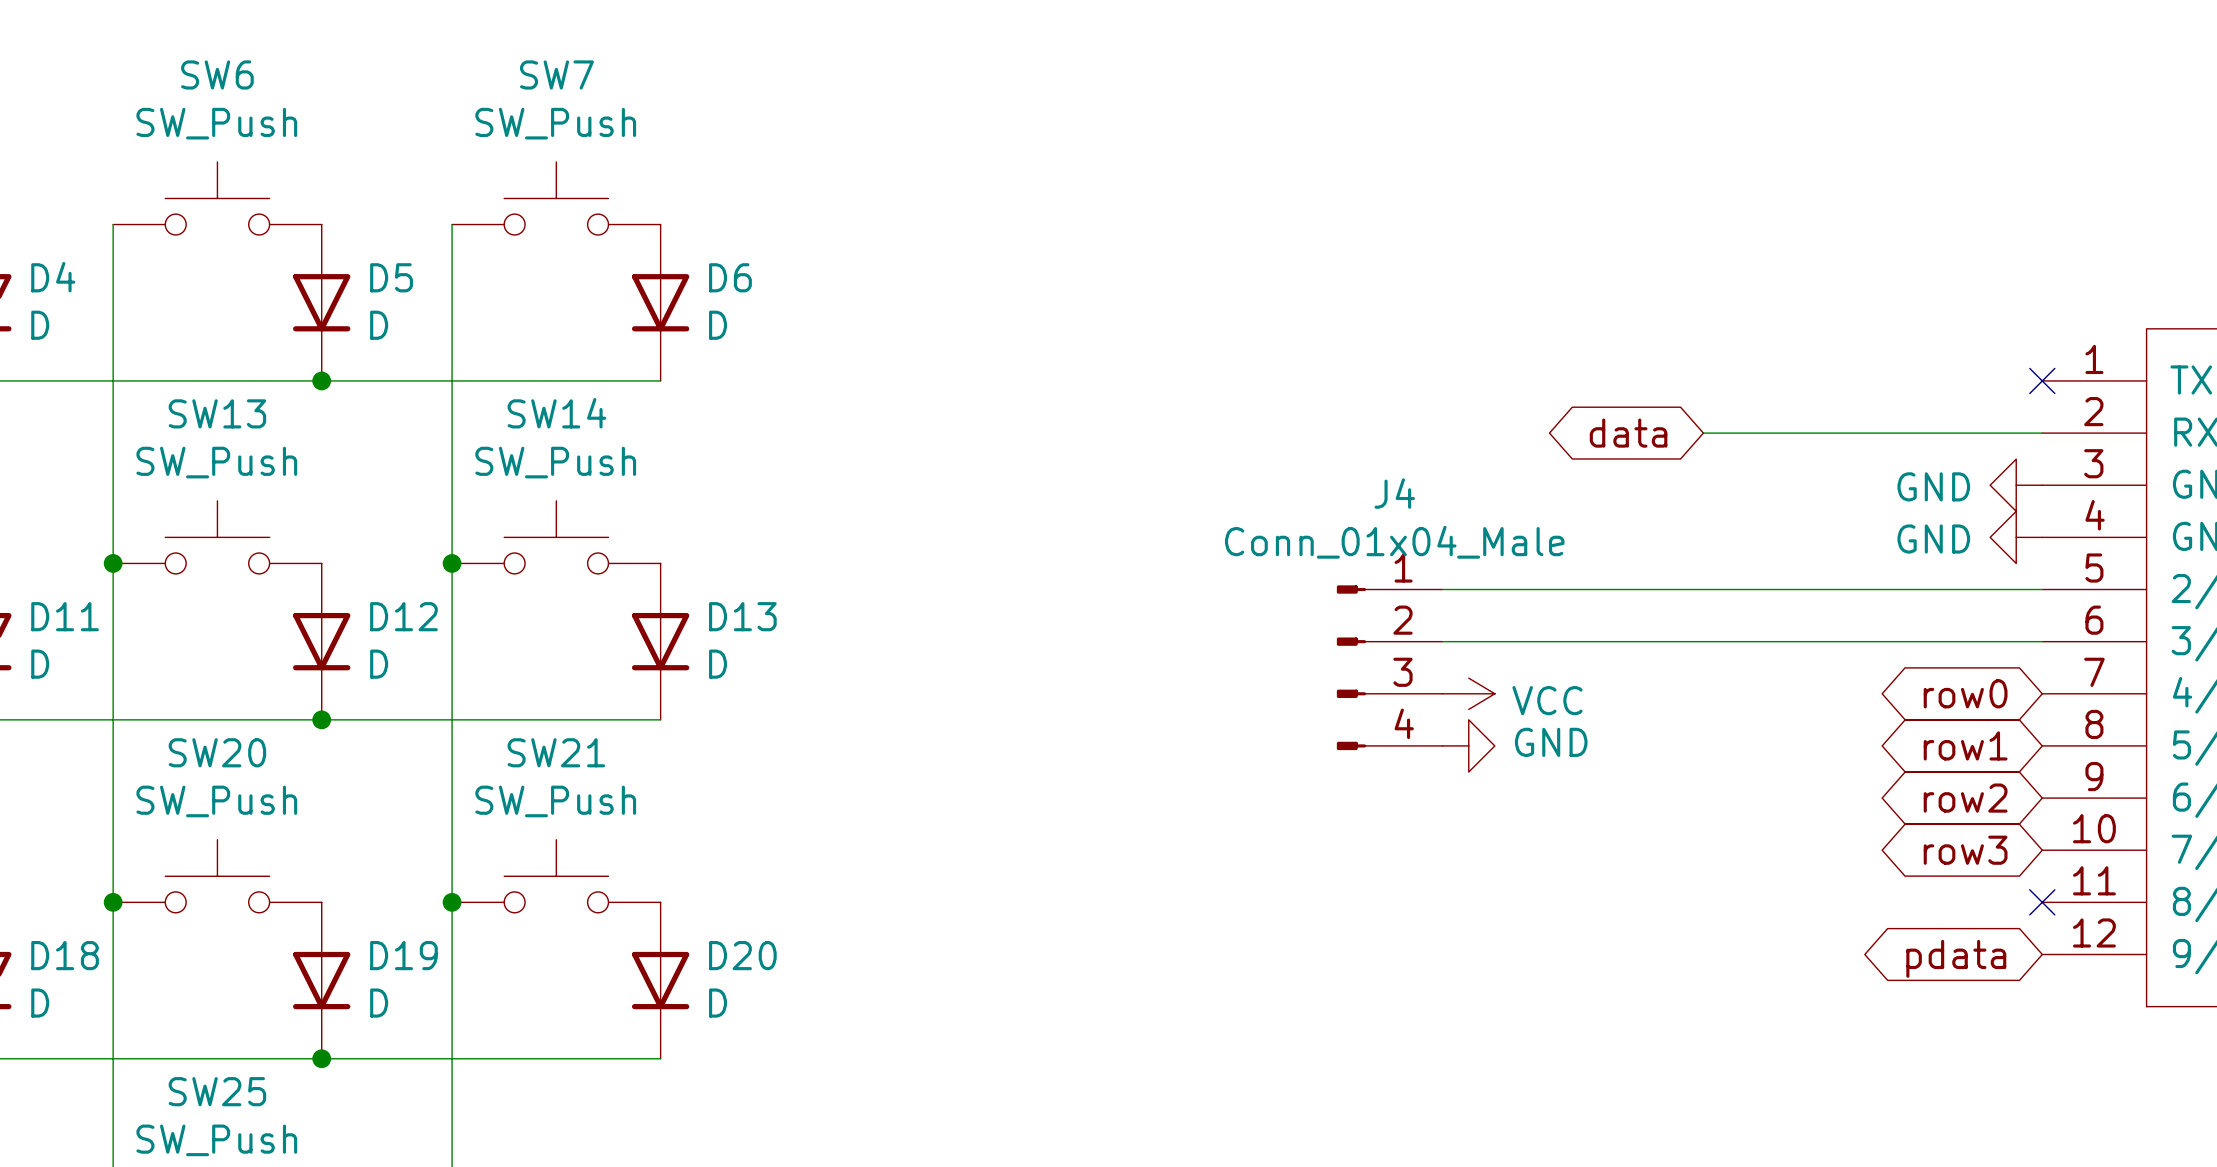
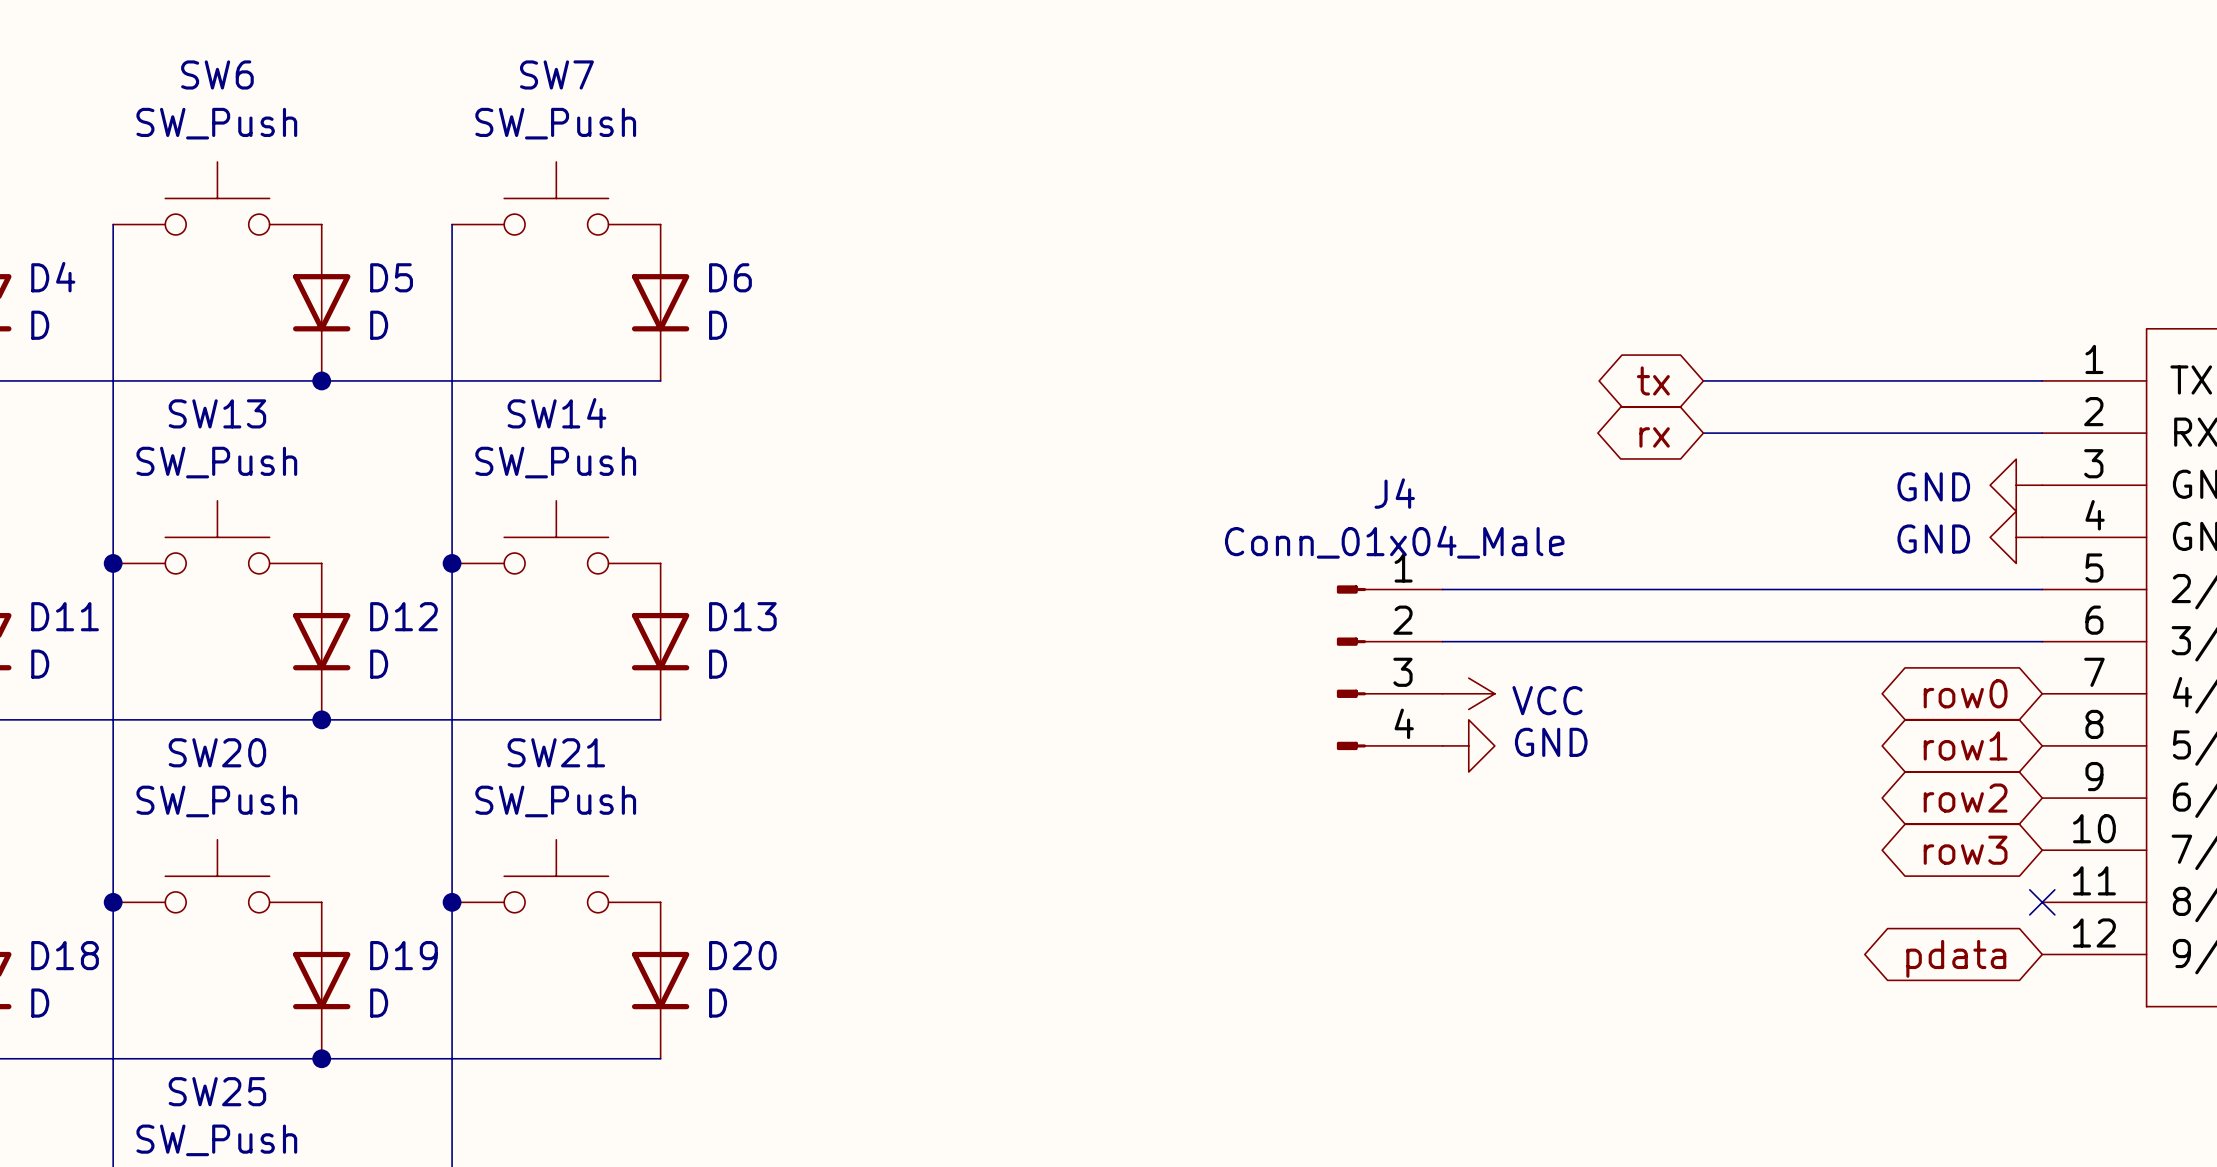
global label: none -> tx (1653, 380)
wire: none -> (1703, 380) (2042, 380)
no-connect mark: (2042, 380) -> none
global label: data (1628, 433) -> rx (1654, 437)

